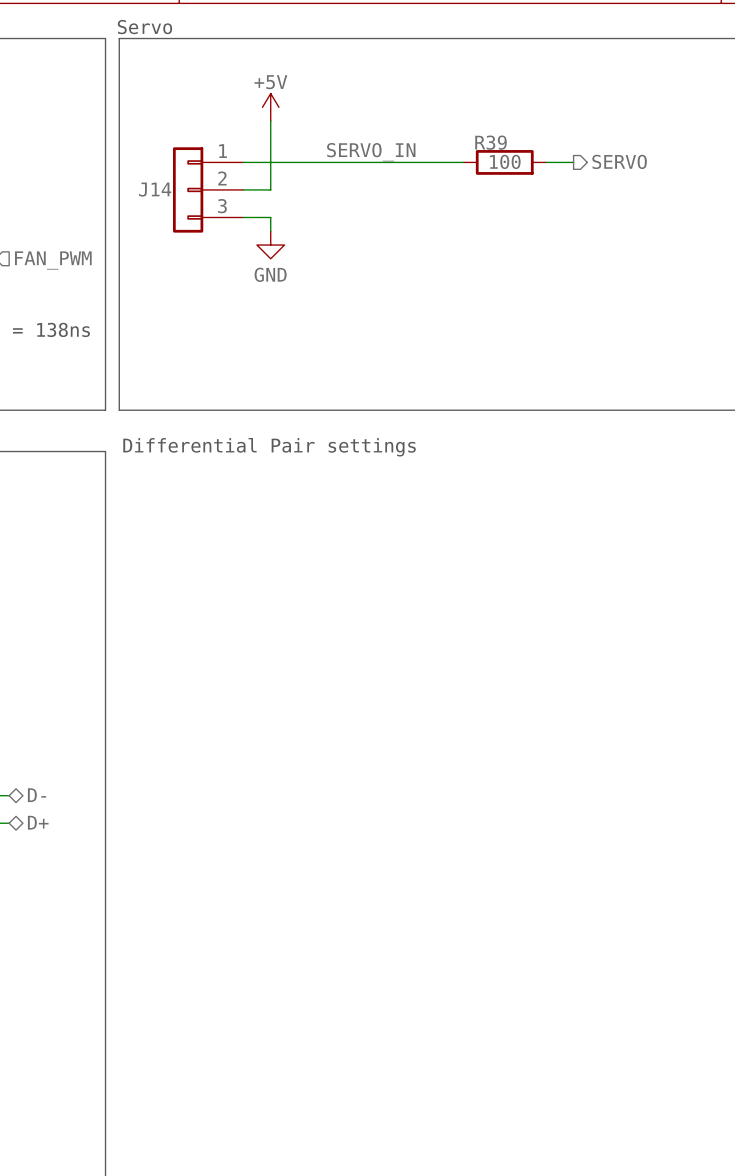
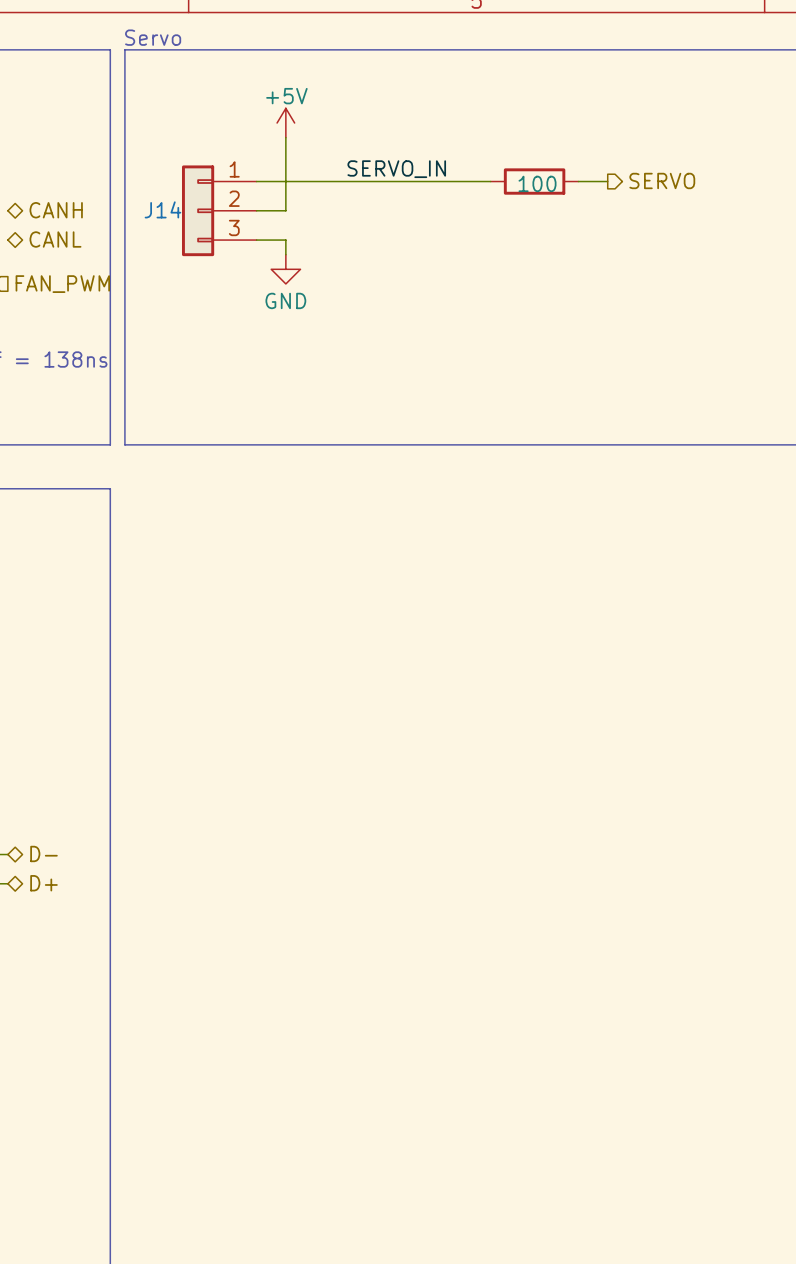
R39 name: R39 (491, 142) -> none
R39 text: 100 (505, 161) -> none
R39 value: none -> 100 (537, 183)
hierarchical label: none -> CANH (56, 210)
hierarchical label: none -> CANL (55, 239)
text: Differential Pair settings (269, 447) -> none

